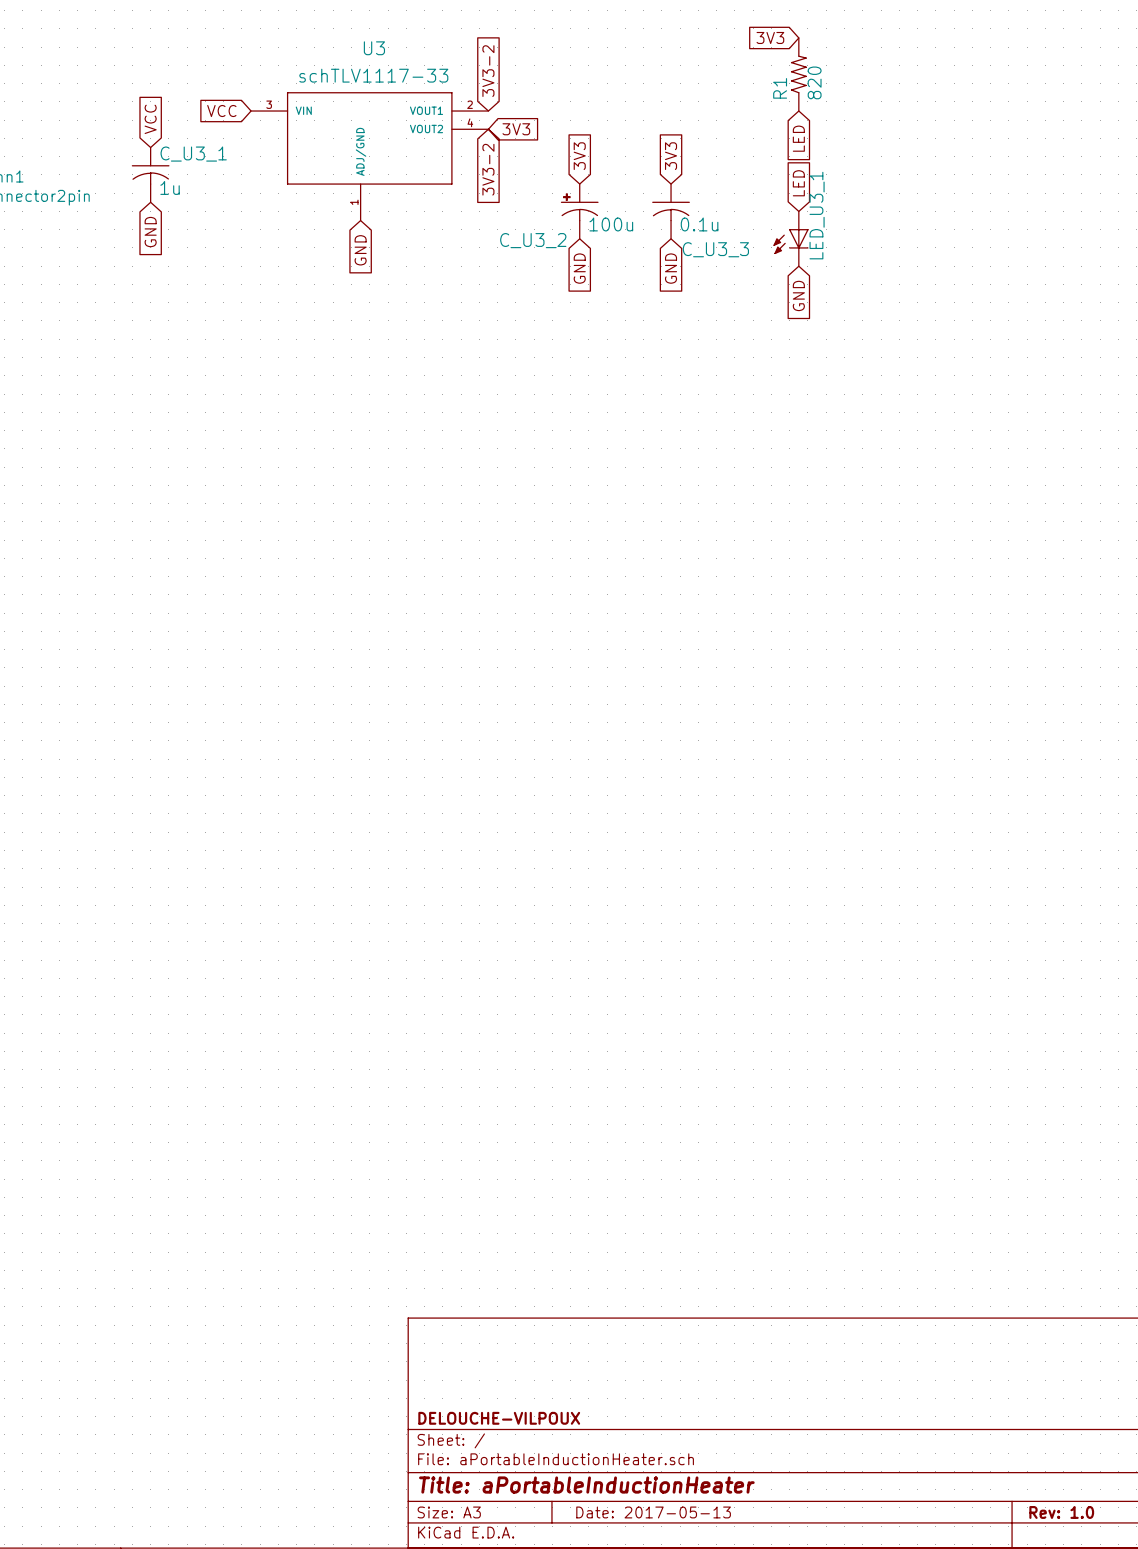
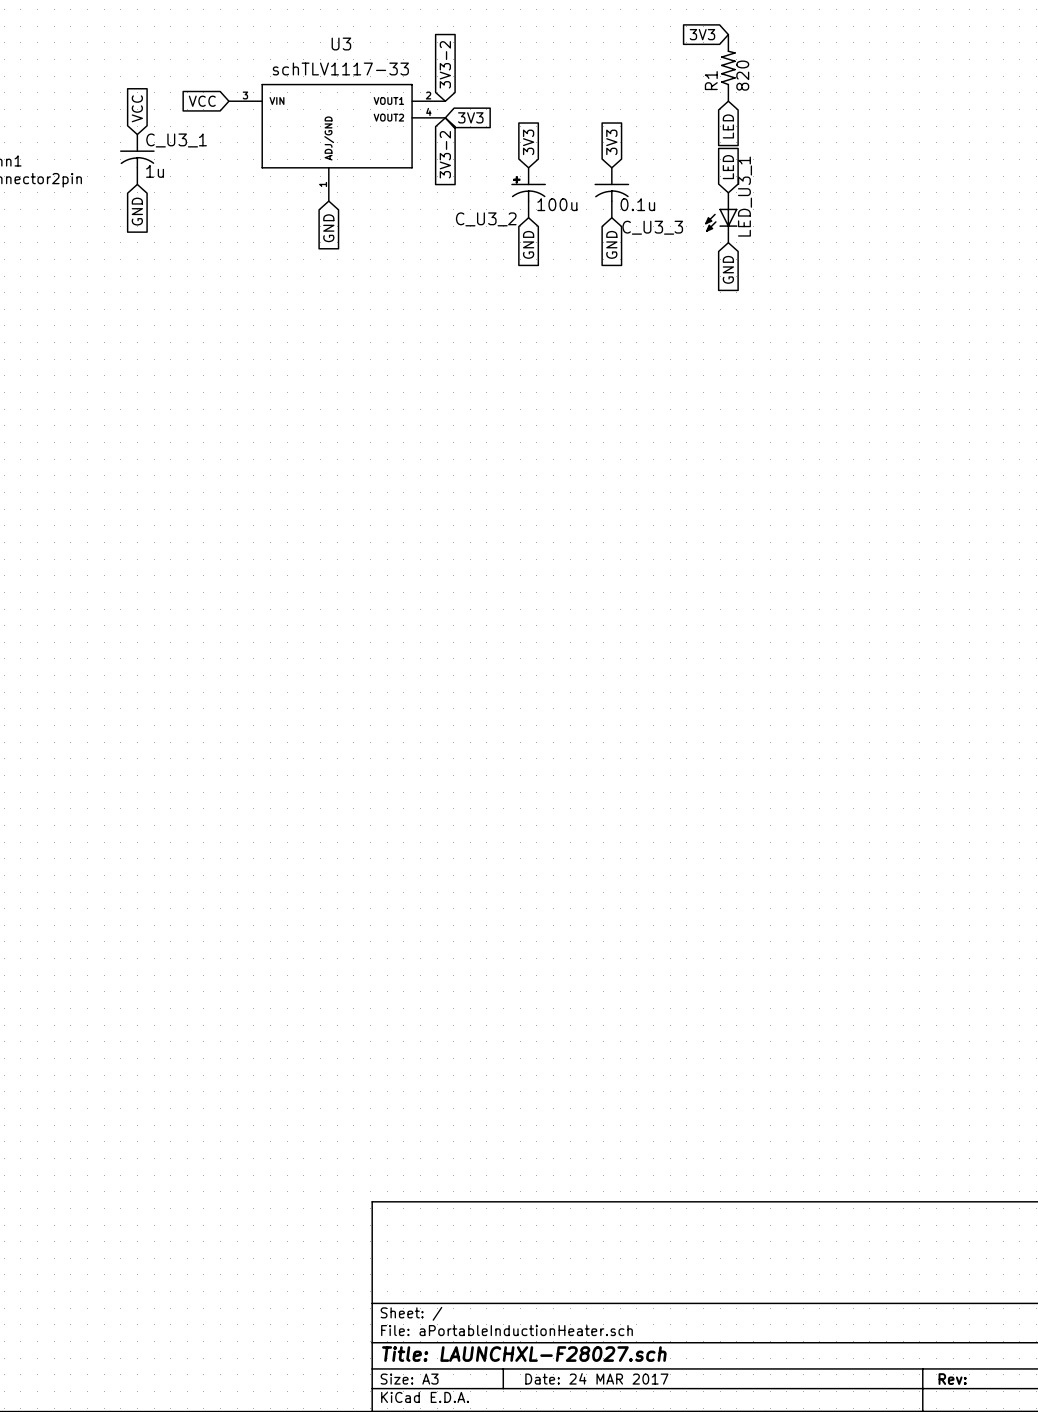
title block: DELOUCHE-VILPOUX (499, 1418) -> none
title block: Title: aPortableInductionHeater (586, 1485) -> Title: LAUNCHXL-F28027.sch (524, 1354)
title block: Date: 2017-05-13 (653, 1512) -> Date: 24 MAR 2017 (596, 1378)
title block: Rev: 1.0 (1061, 1512) -> Rev: (952, 1379)

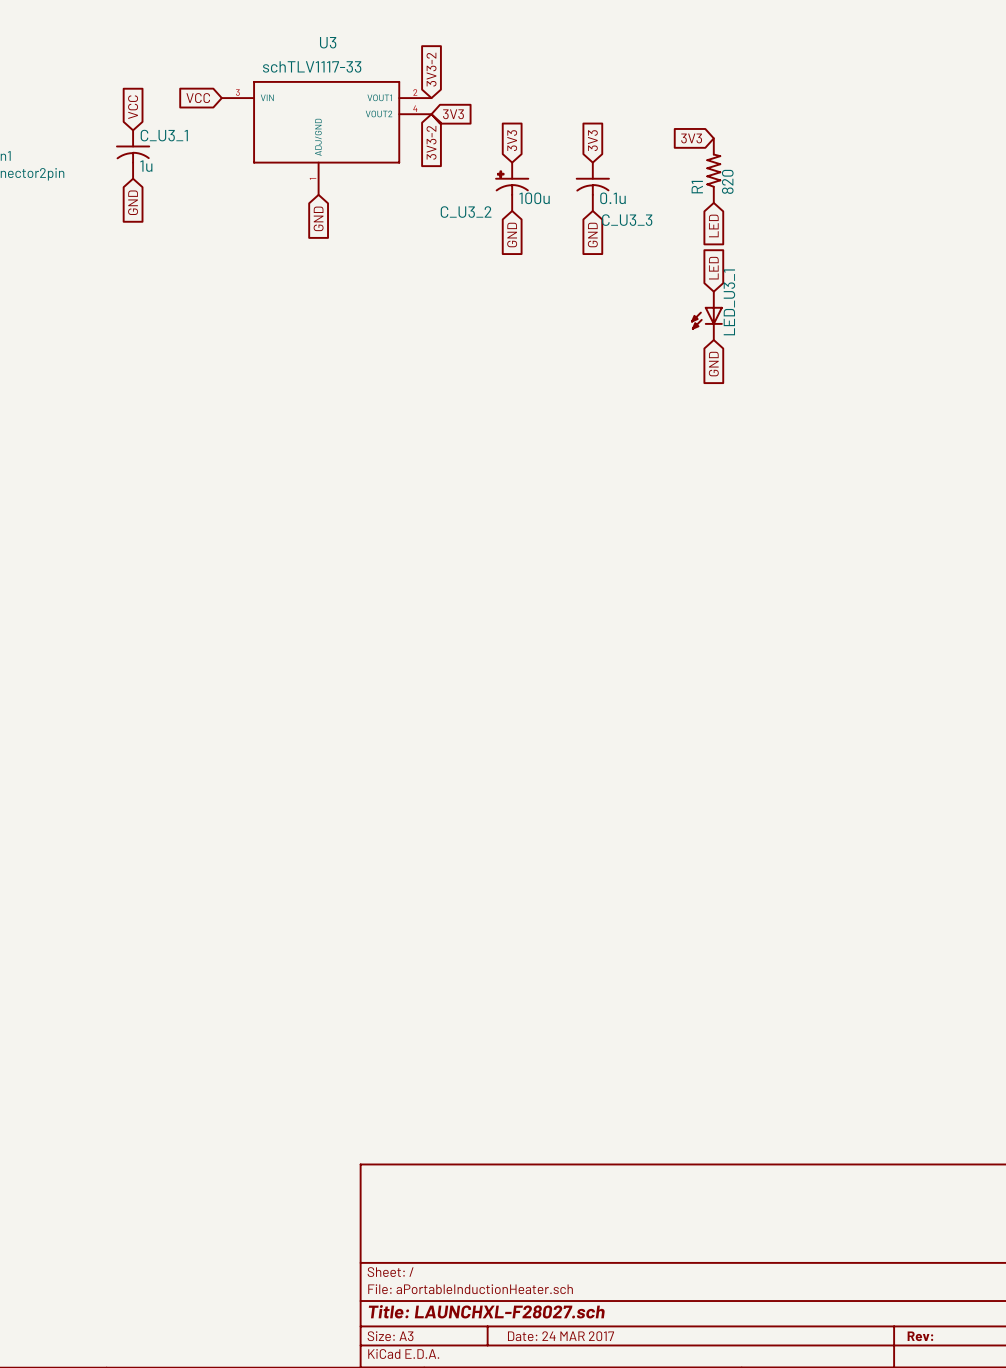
global label position: 3V3 (702, 34) -> 3V3 (691, 138)
R1 position: (728, 67) -> (713, 170)
global label: LED (728, 126) -> none
global label rotation: 0° (728, 167) -> 180° (713, 225)
global label position: LED (728, 167) -> LED (713, 225)
LED_U3_1 position: (721, 217) -> (706, 315)
global label position: GND (728, 269) -> GND (713, 364)
global label: none -> LED (713, 268)

